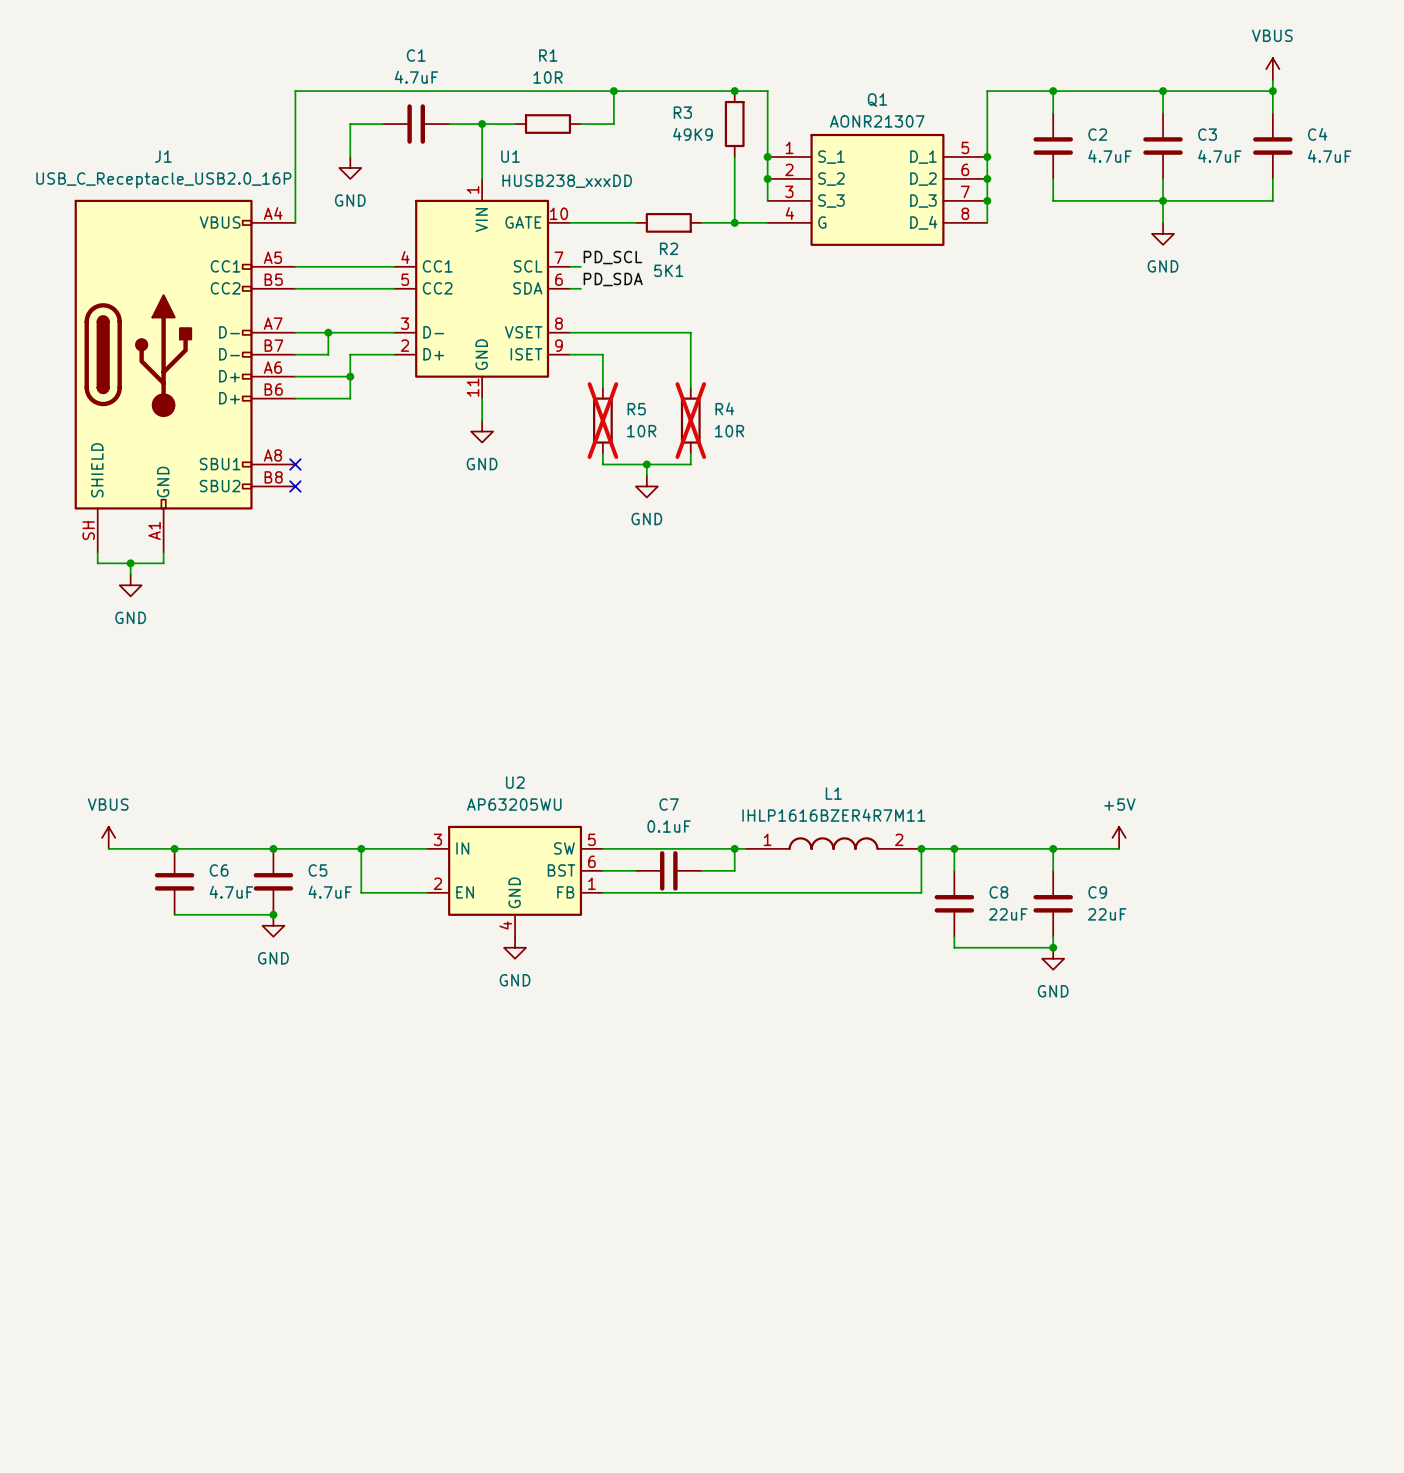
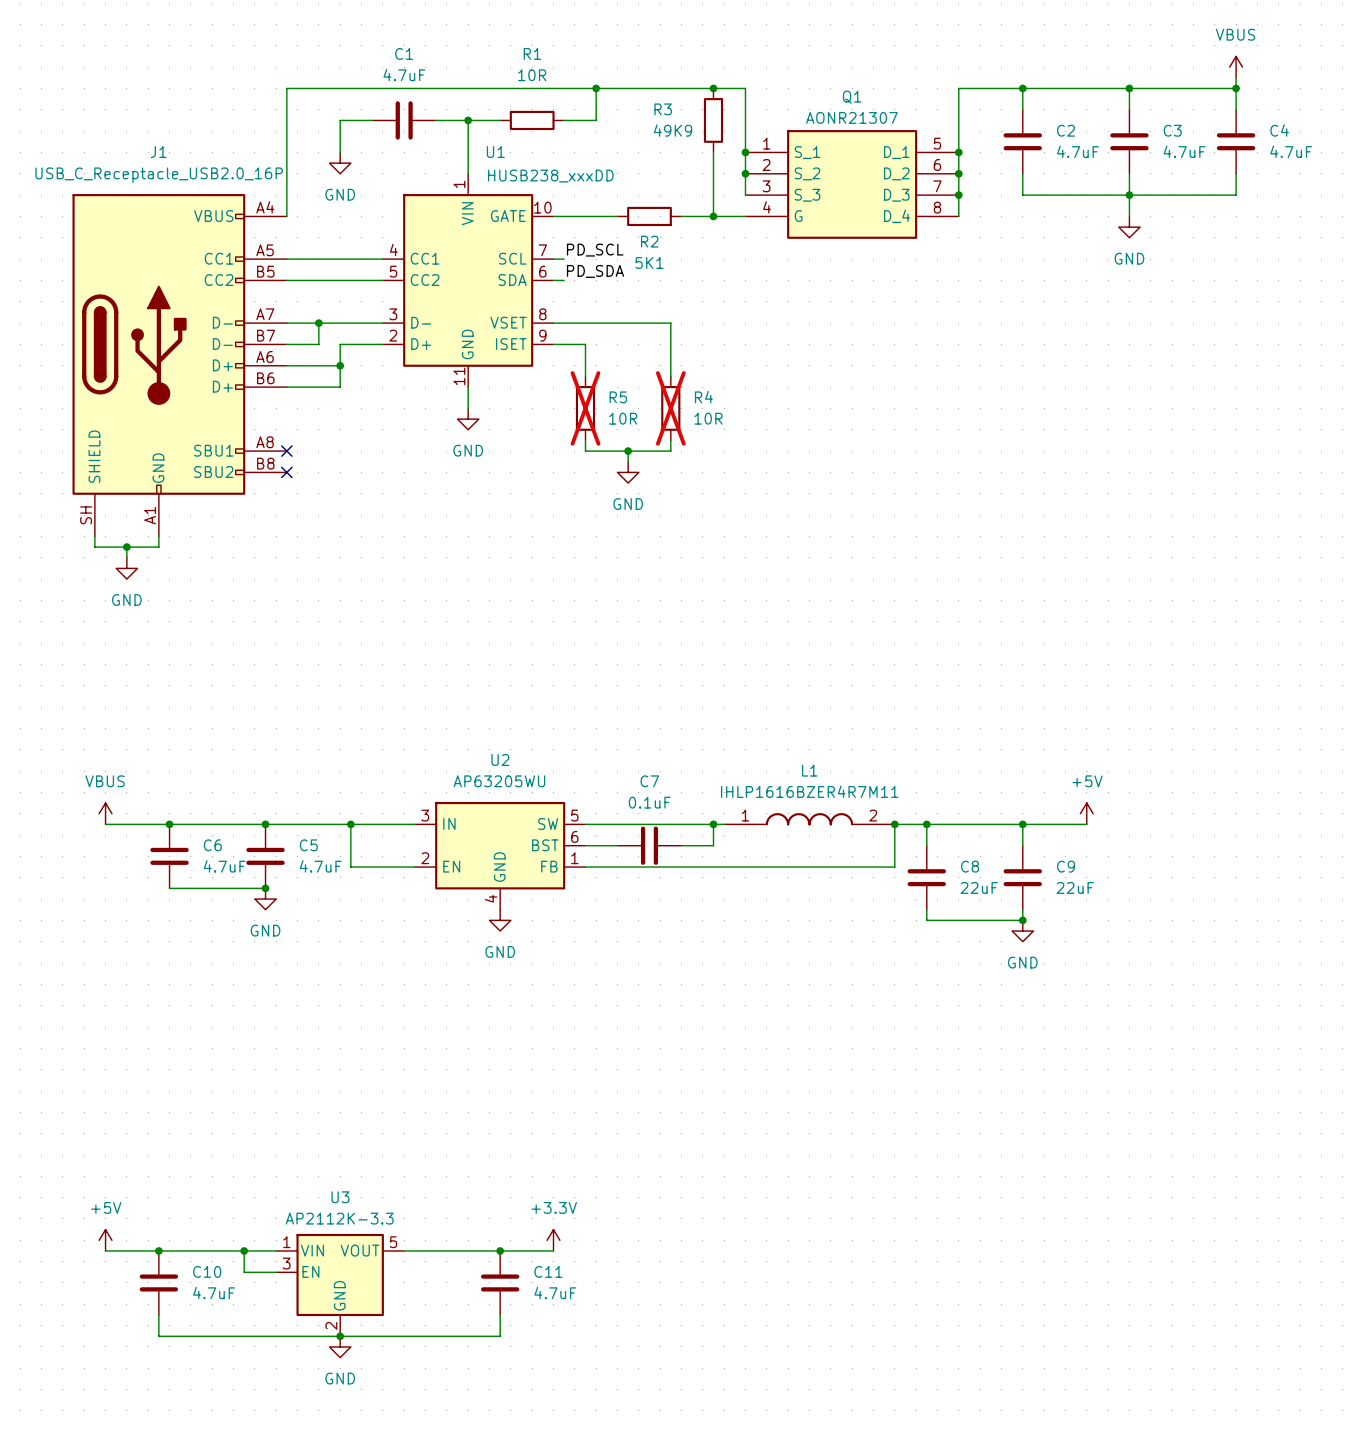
power symbol: none -> +5V (105, 1240)
power symbol: none -> +3.3V (553, 1240)
wire: none -> (105, 1250) (276, 1250)
junction: none -> (158, 1250)
wire: none -> (244, 1250) (244, 1272) (276, 1272)
junction: none -> (244, 1250)
wire: none -> (404, 1250) (553, 1250)
junction: none -> (500, 1250)
C10: none -> 4.7uF (158, 1282)
C11: none -> 4.7uF (500, 1282)
U3: none -> AP2112K-3.3 (340, 1285)
wire: none -> (158, 1314) (158, 1336) (500, 1336) (500, 1314)
junction: none -> (340, 1336)
power symbol: none -> GND (340, 1346)

